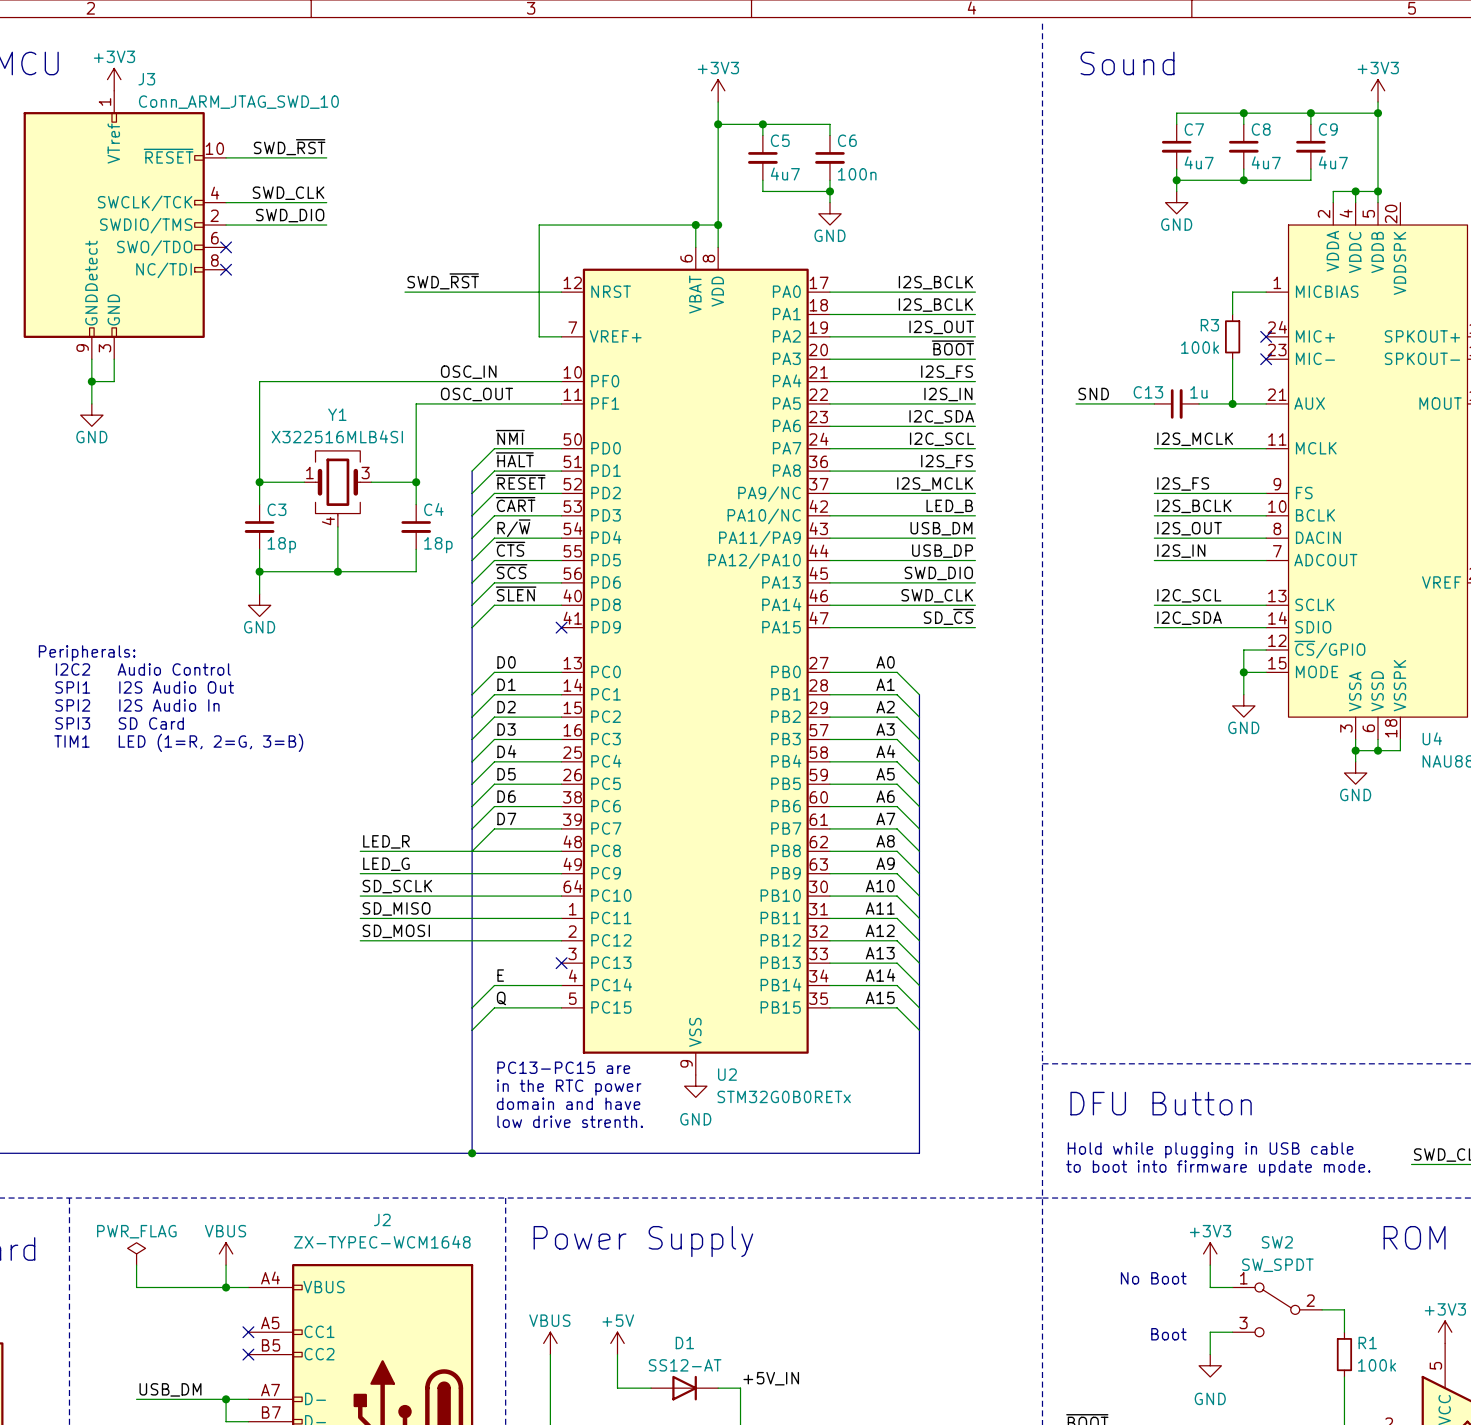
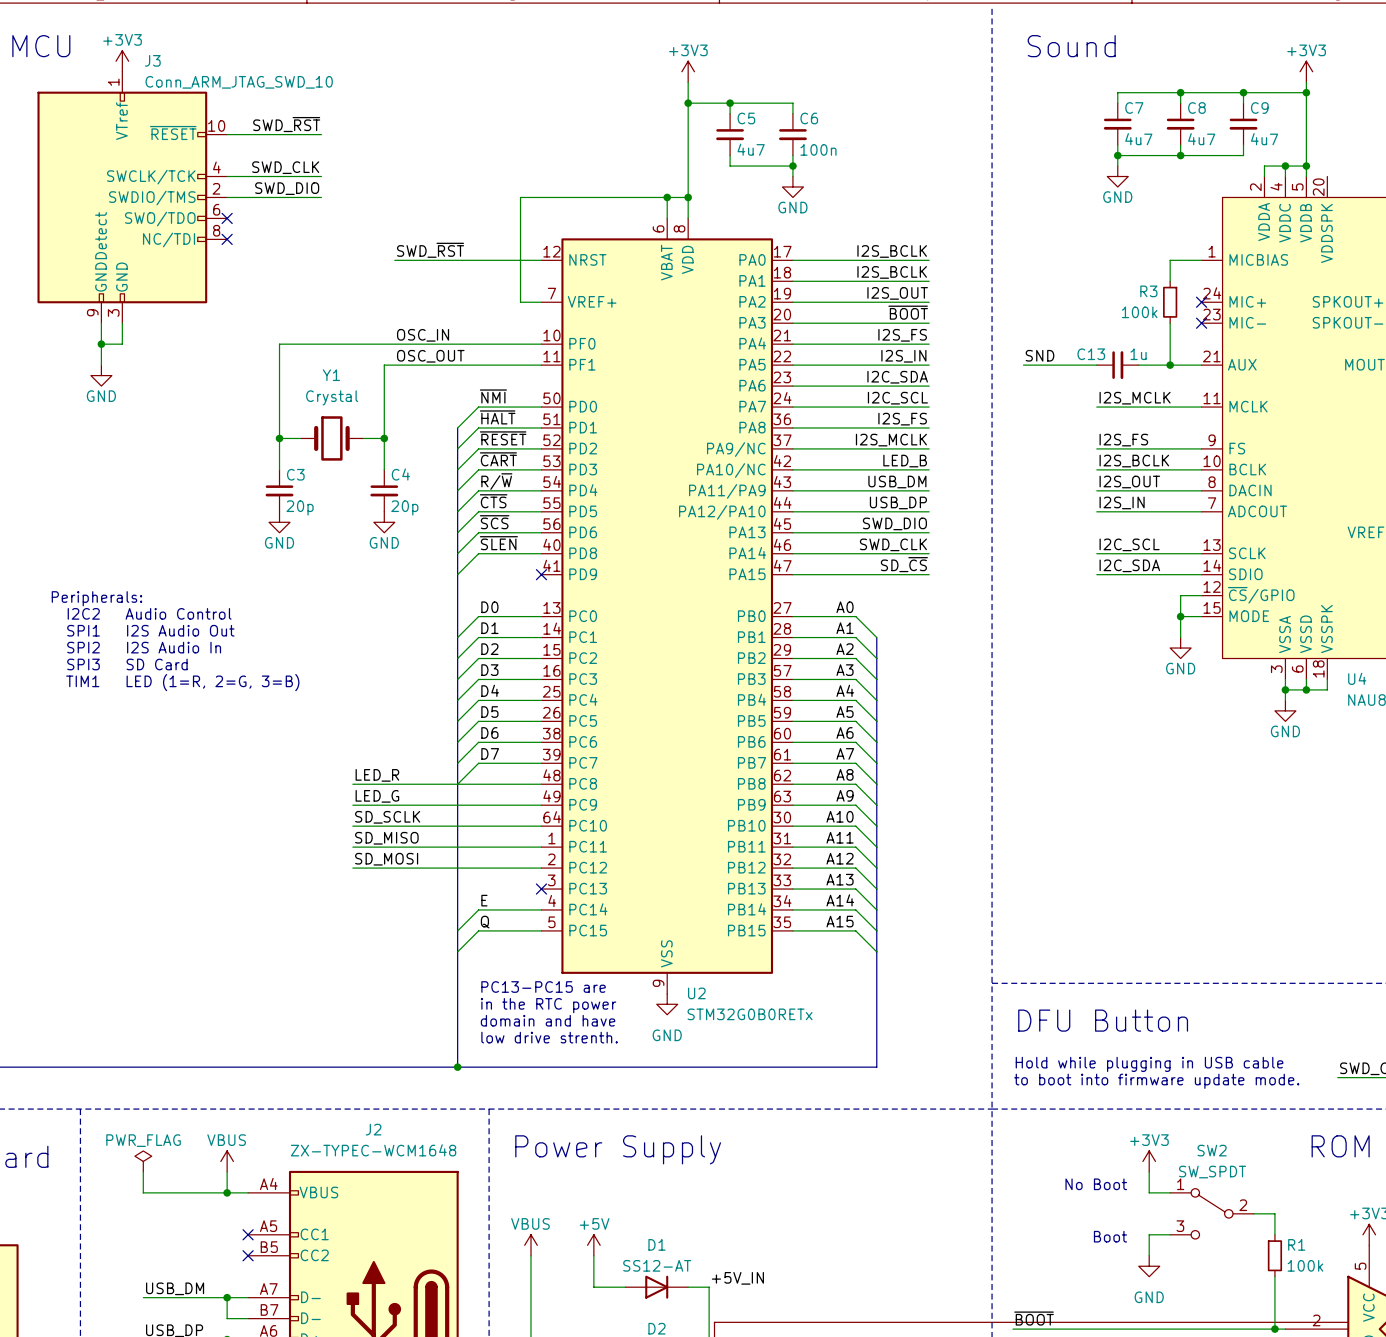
label position: OSC_IN (468, 372) -> OSC_IN (423, 335)
wire: (281, 381) (259, 381) (259, 504) -> (279, 344) (279, 469)
label position: OSC_OUT (476, 394) -> OSC_OUT (430, 356)
wire: (416, 403) (416, 504) -> (405, 365) (384, 365) (384, 469)
Y1 value: X322516MLB4SI (337, 436) -> Crystal (332, 397)
Y1 symbol: [304, 450, 372, 527] -> [300, 416, 364, 461]
wire: (259, 482) (281, 482) -> none
junction position: (259, 482) -> (279, 438)
wire: (393, 482) (416, 482) -> none
junction position: (416, 482) -> (384, 438)
C3 position: (259, 526) -> (279, 490)
wire: (337, 526) (337, 571) -> none
C4 position: (416, 526) -> (384, 490)
C3 value: 18p (281, 545) -> 20p (300, 507)
C4 value: 18p (438, 545) -> 20p (404, 507)
wire: (259, 549) (259, 594) -> none
wire: (416, 549) (416, 571) (259, 571) -> none
junction: (259, 571) -> none
junction: (337, 571) -> none
power symbol: none -> GND (384, 522)
power symbol position: GND (259, 605) -> GND (279, 522)

